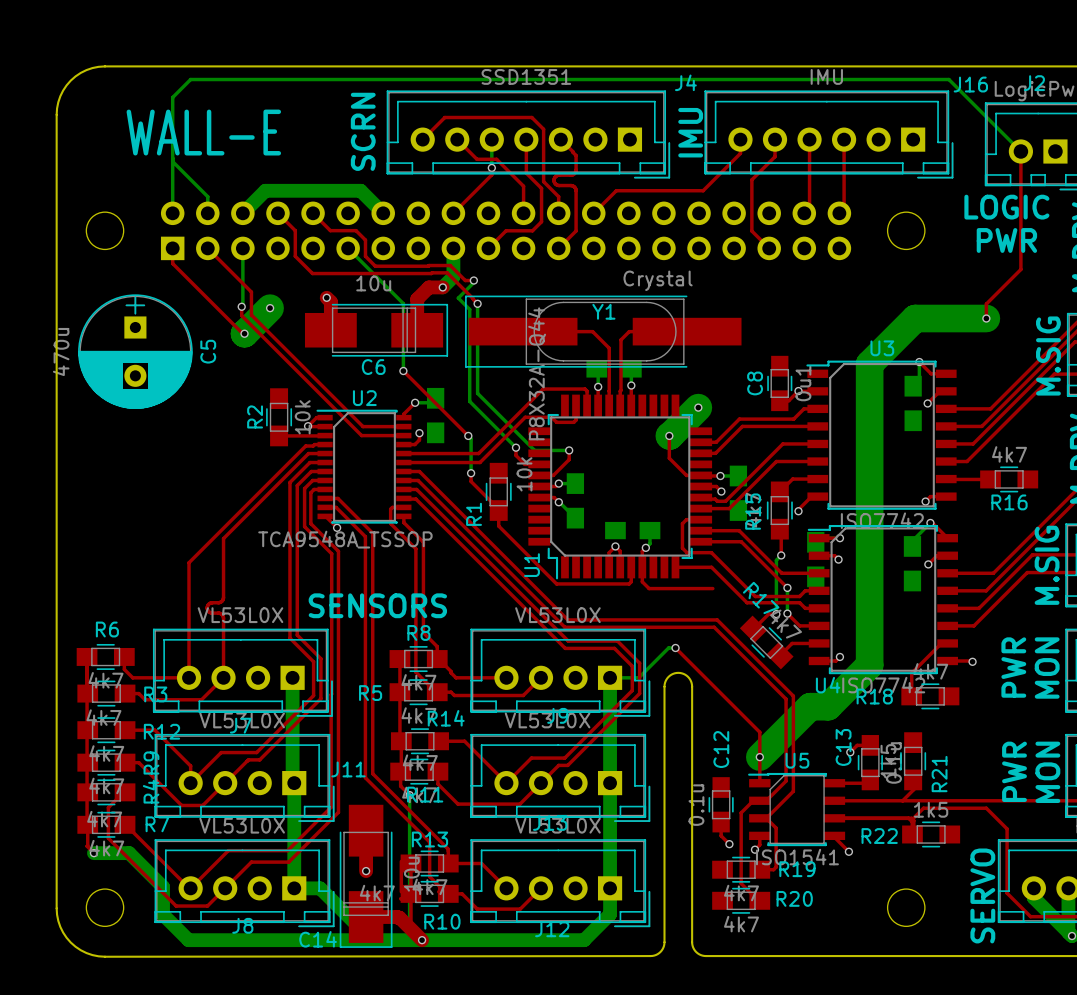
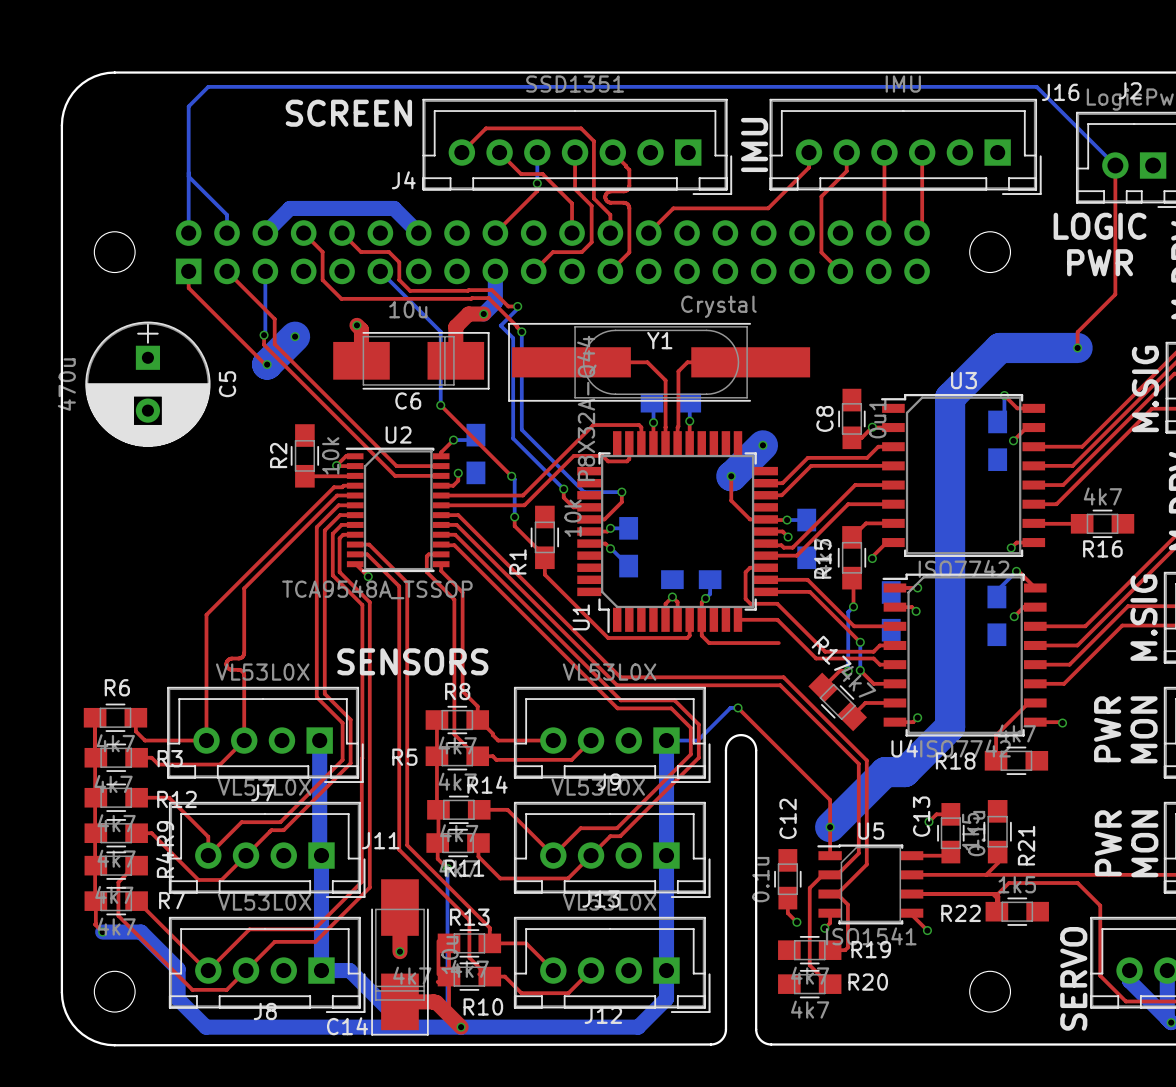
J4 name position: J4 (685, 82) -> J4 (403, 180)
text: SCRN (363, 131) -> SCREEN (348, 113)
text: WALL-E (203, 132) -> none

